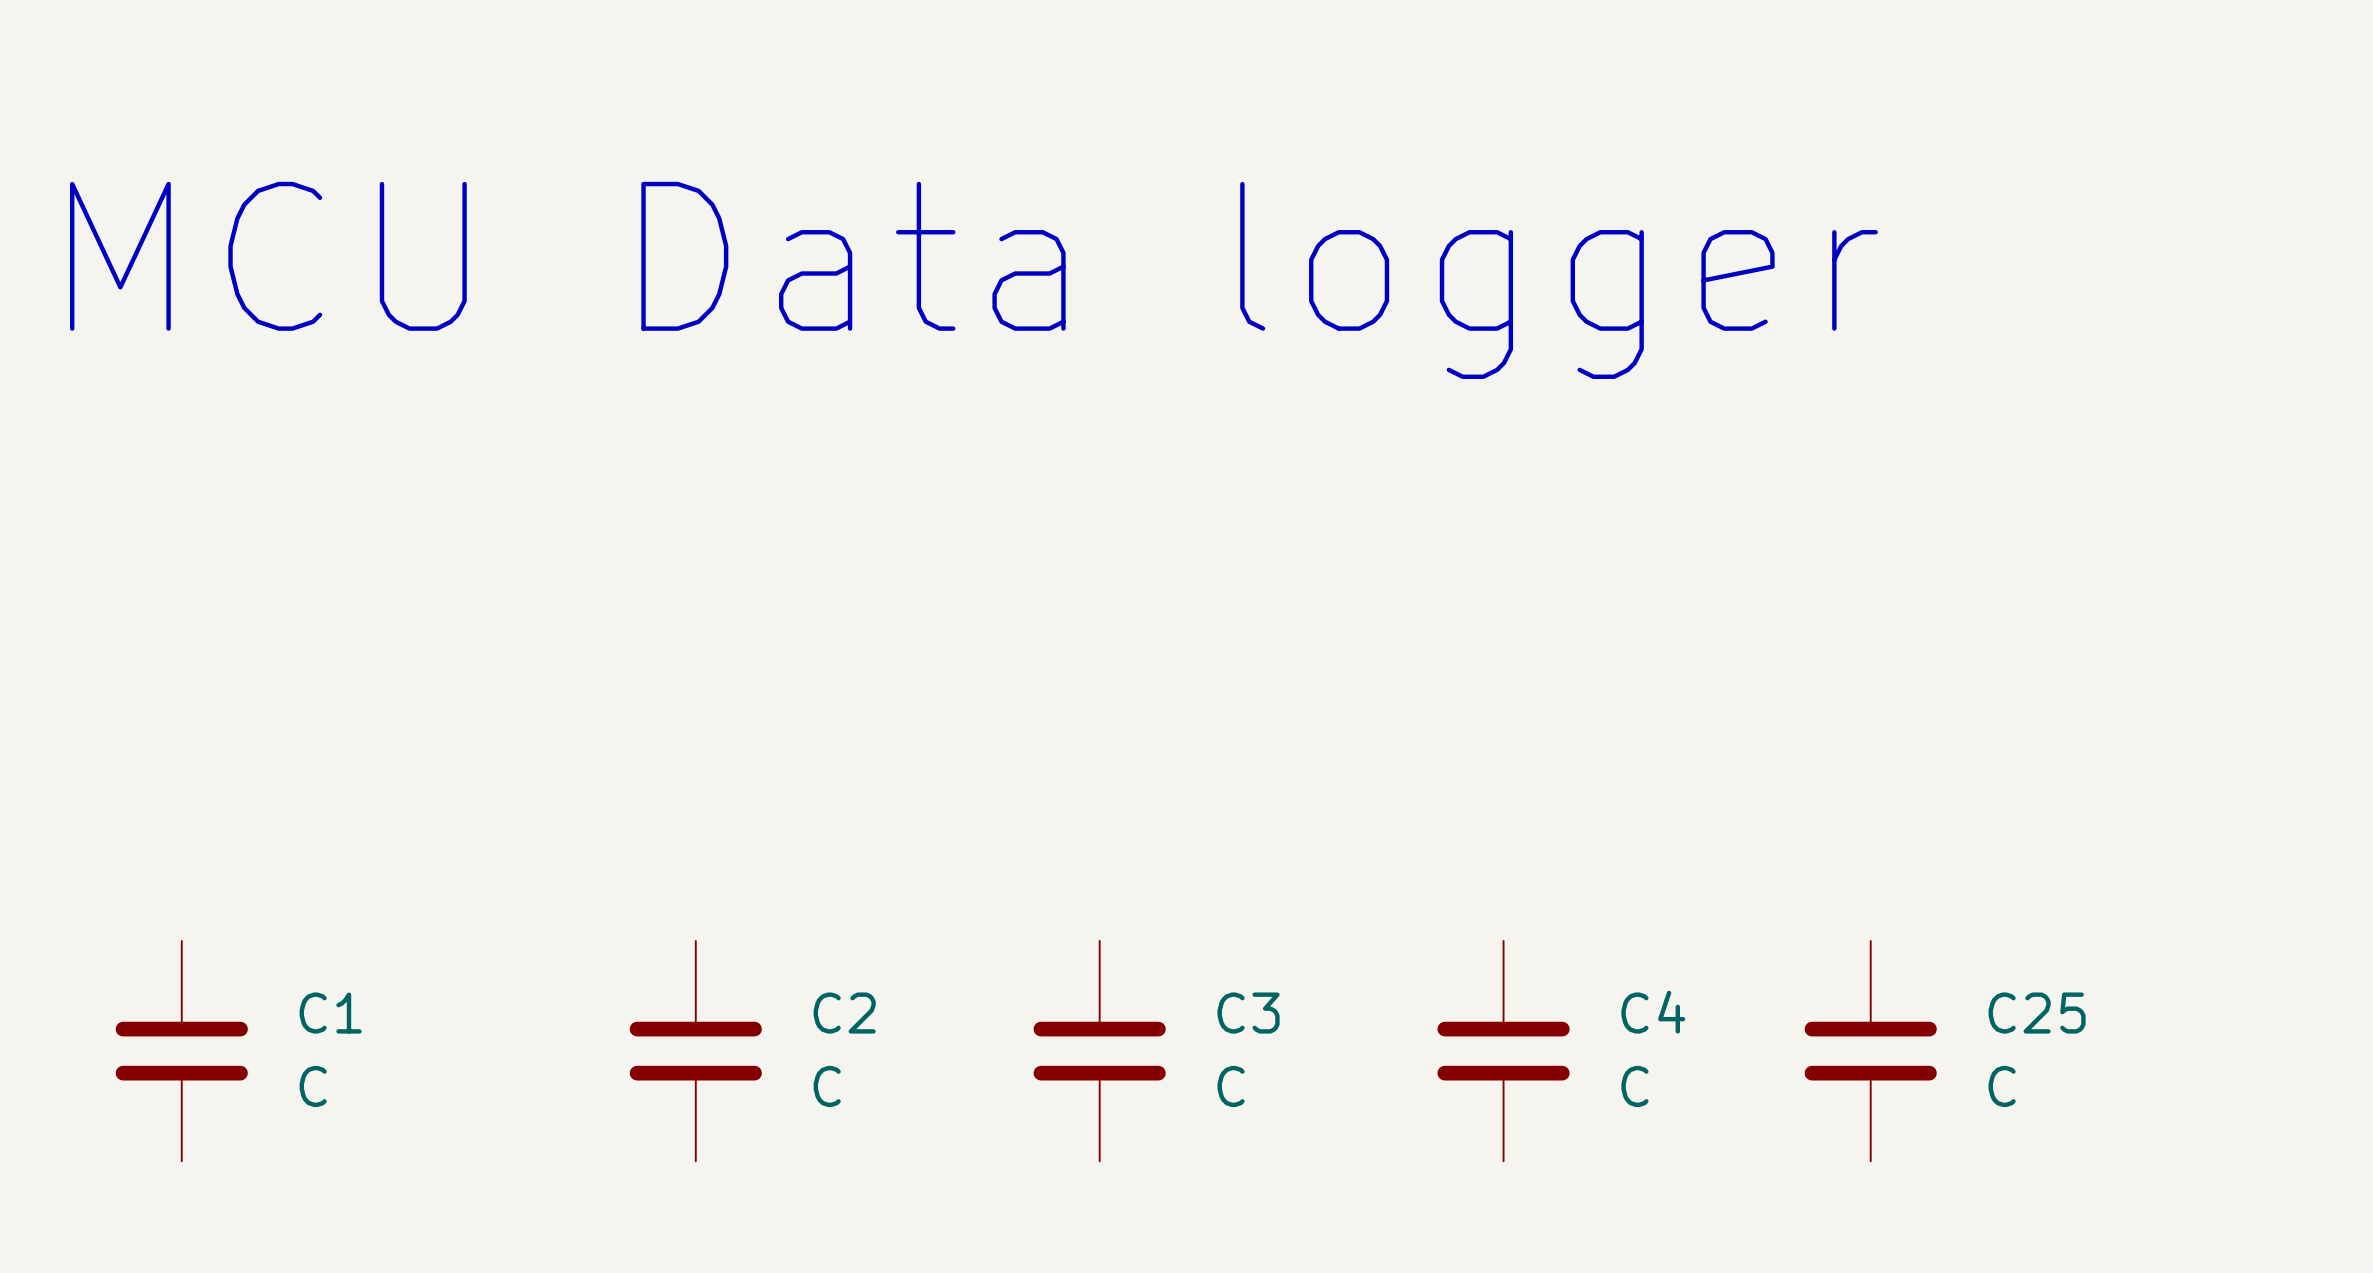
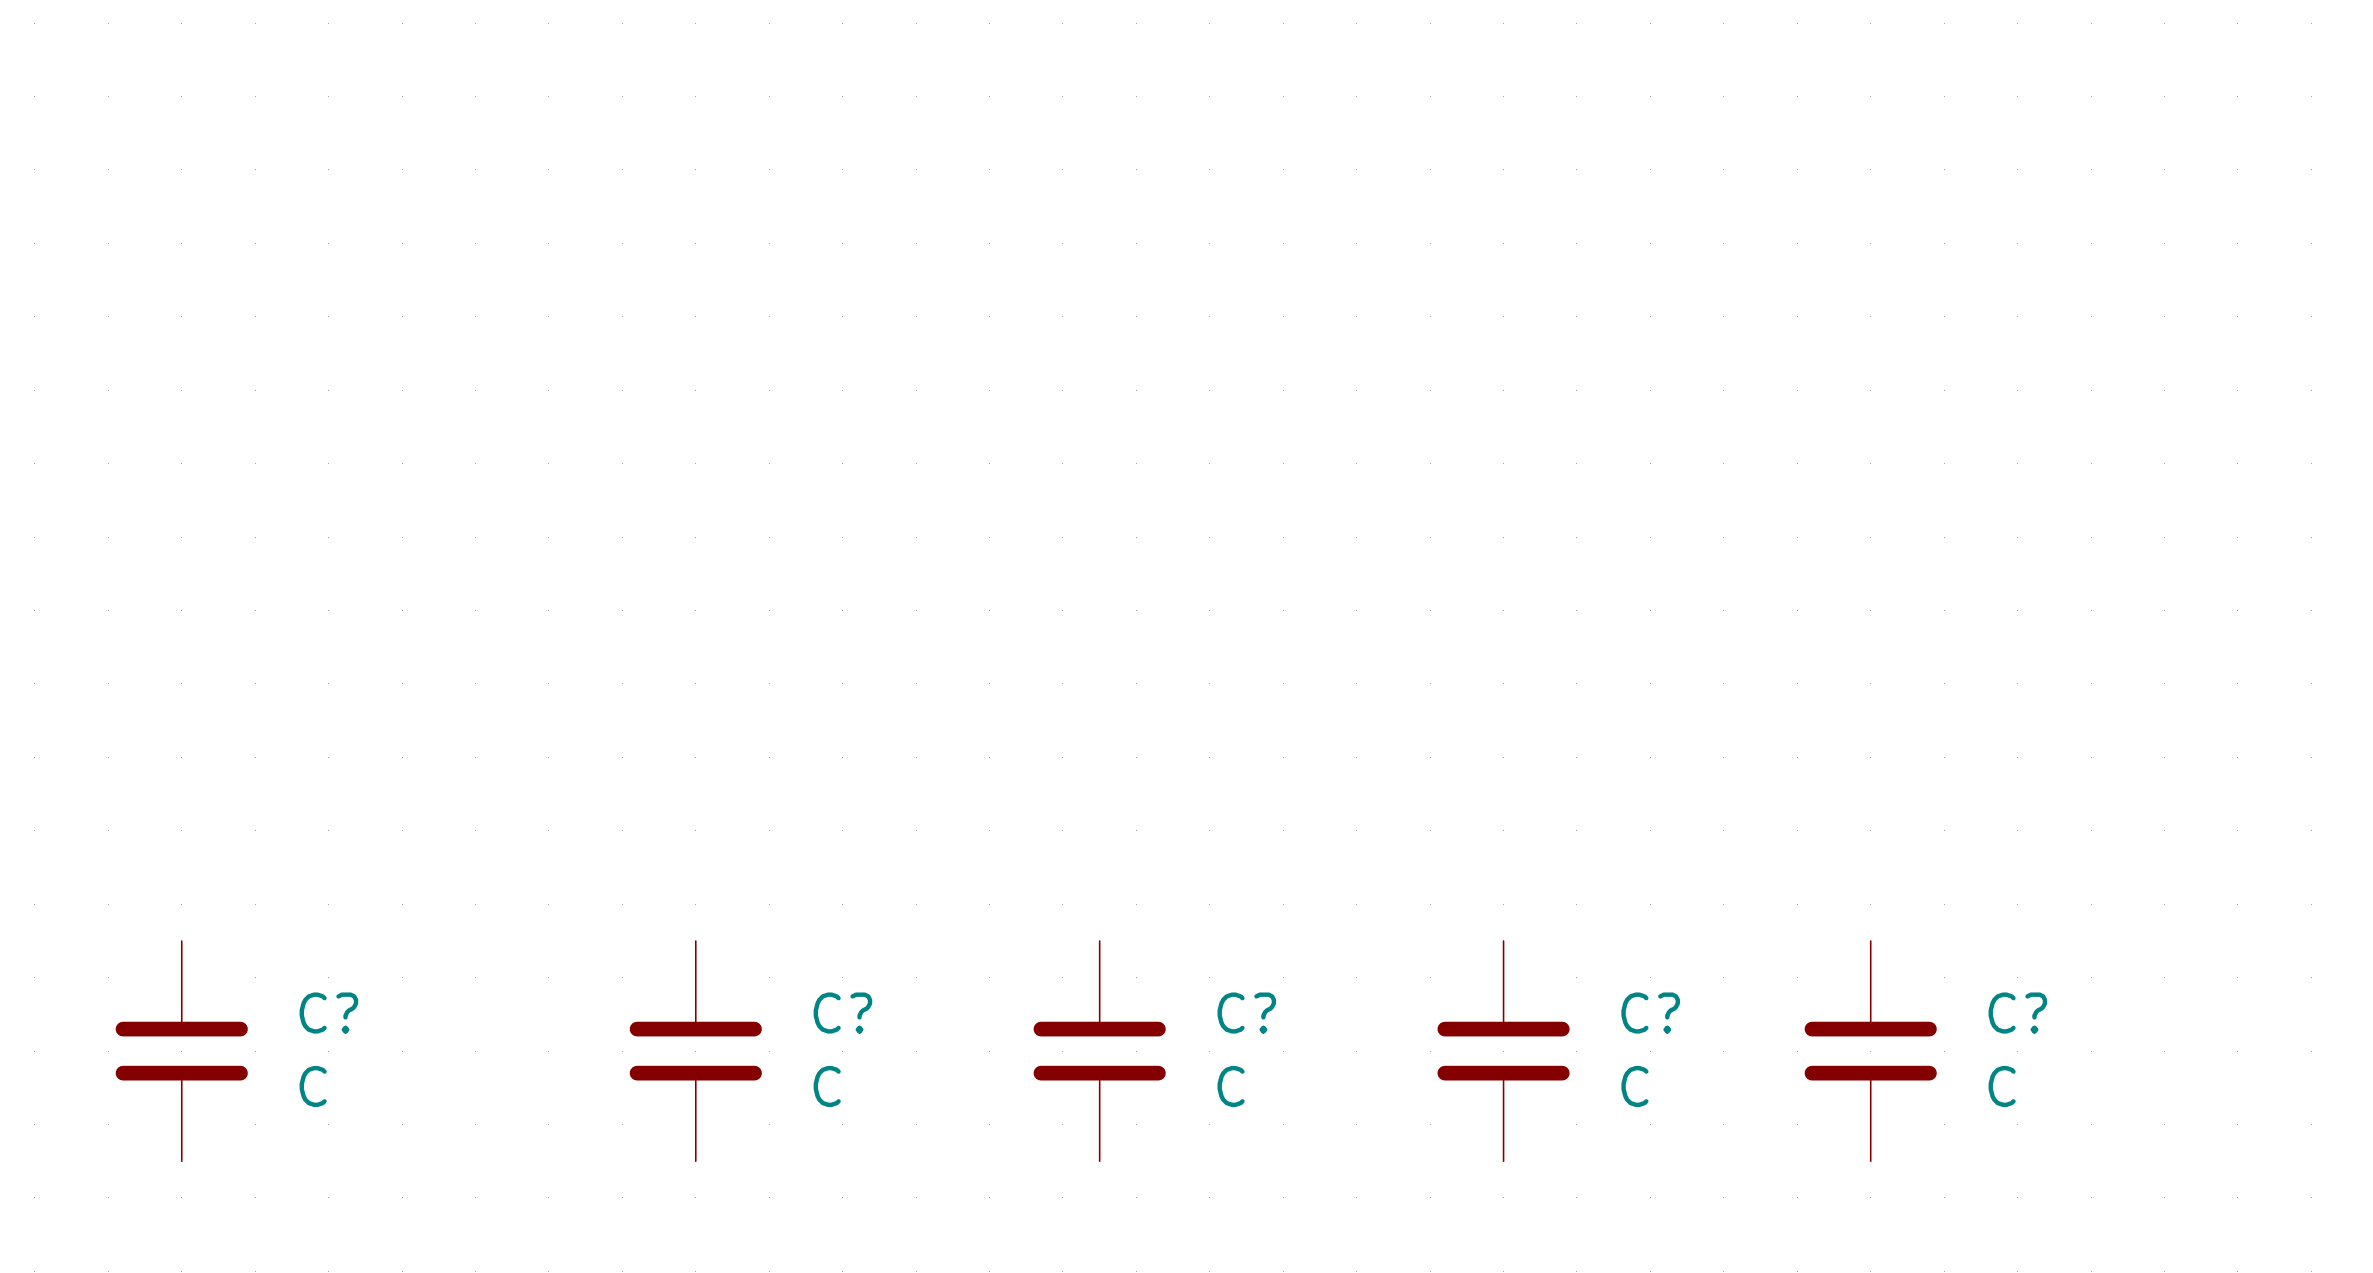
text: MCU Data logger (973, 280) -> none
C4 name: C4 (1653, 1012) -> C? (1650, 1013)
C1 name: C1 (330, 1013) -> C? (328, 1013)
C2 name: C2 (844, 1013) -> C? (842, 1013)
C3 name: C3 (1248, 1013) -> C? (1246, 1013)
C25 name: C25 (2037, 1013) -> C? (2017, 1013)

